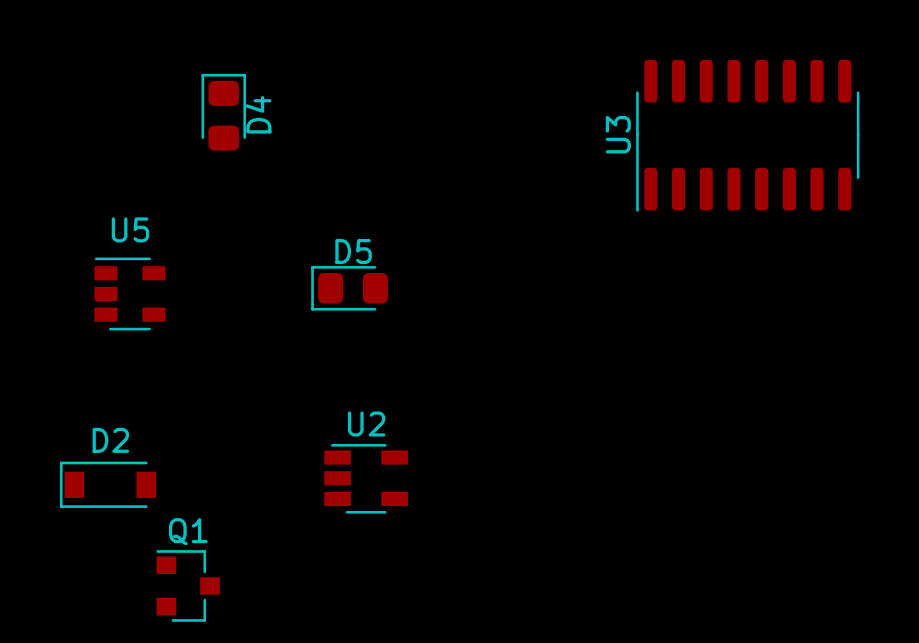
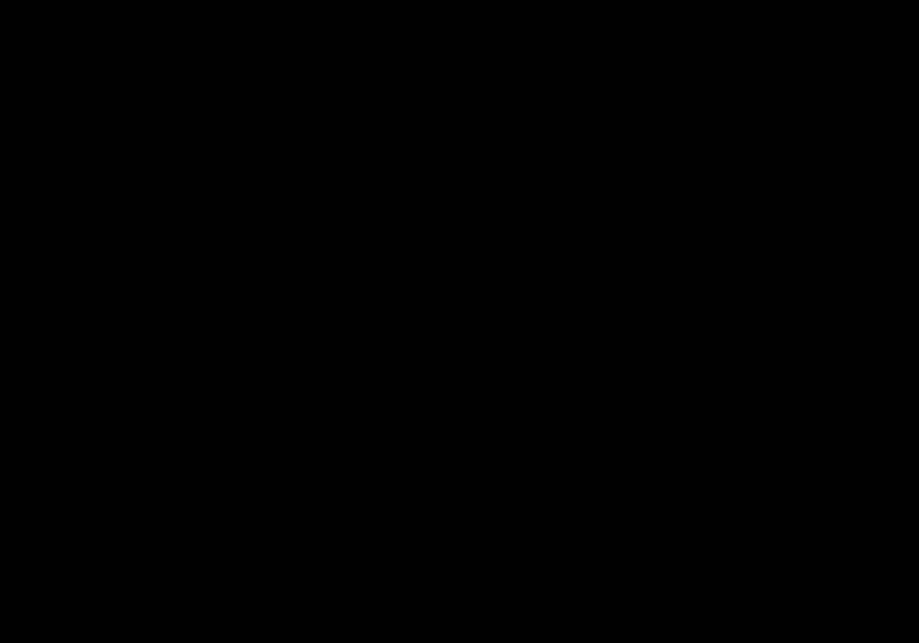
D4: (223, 112) -> none
U3: (747, 135) -> none
D5: (349, 288) -> none
U5: (129, 293) -> none
U2: (366, 478) -> none
D2: (108, 484) -> none
Q1: (188, 585) -> none

